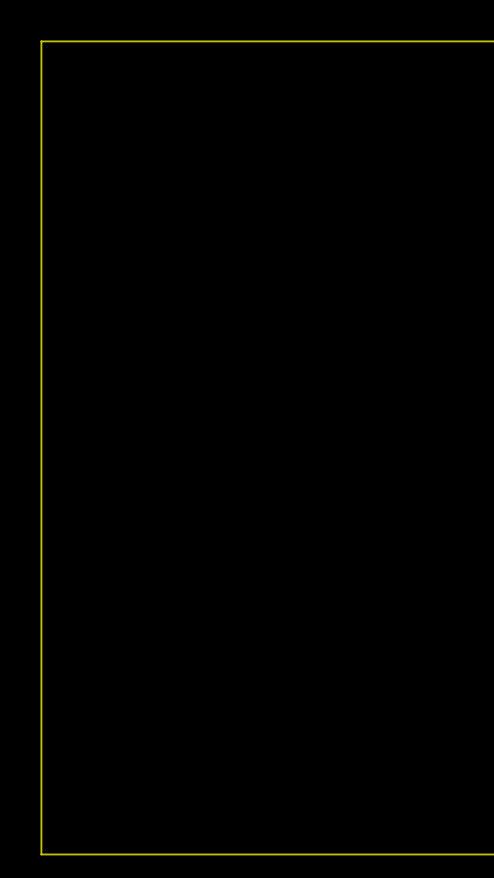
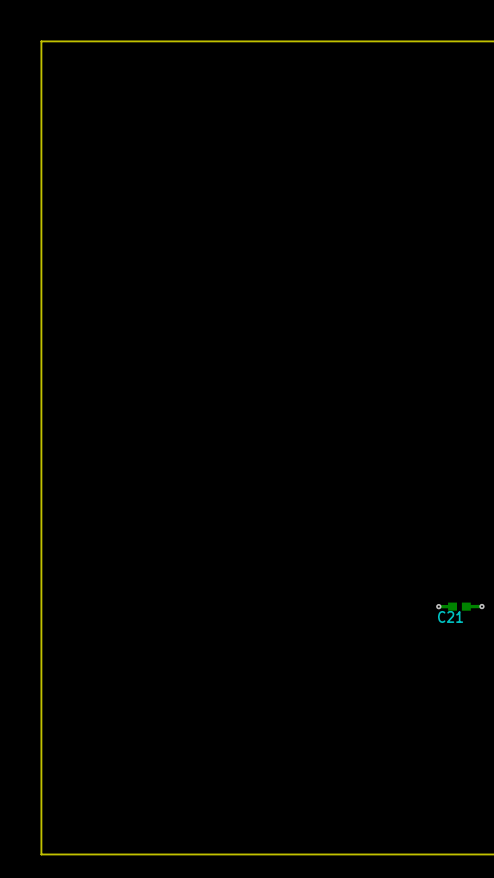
via: none -> (438, 606)
track: none -> (452, 606) (438, 606)
C21: none -> (459, 606)
track: none -> (481, 606) (466, 606)
via: none -> (481, 606)

